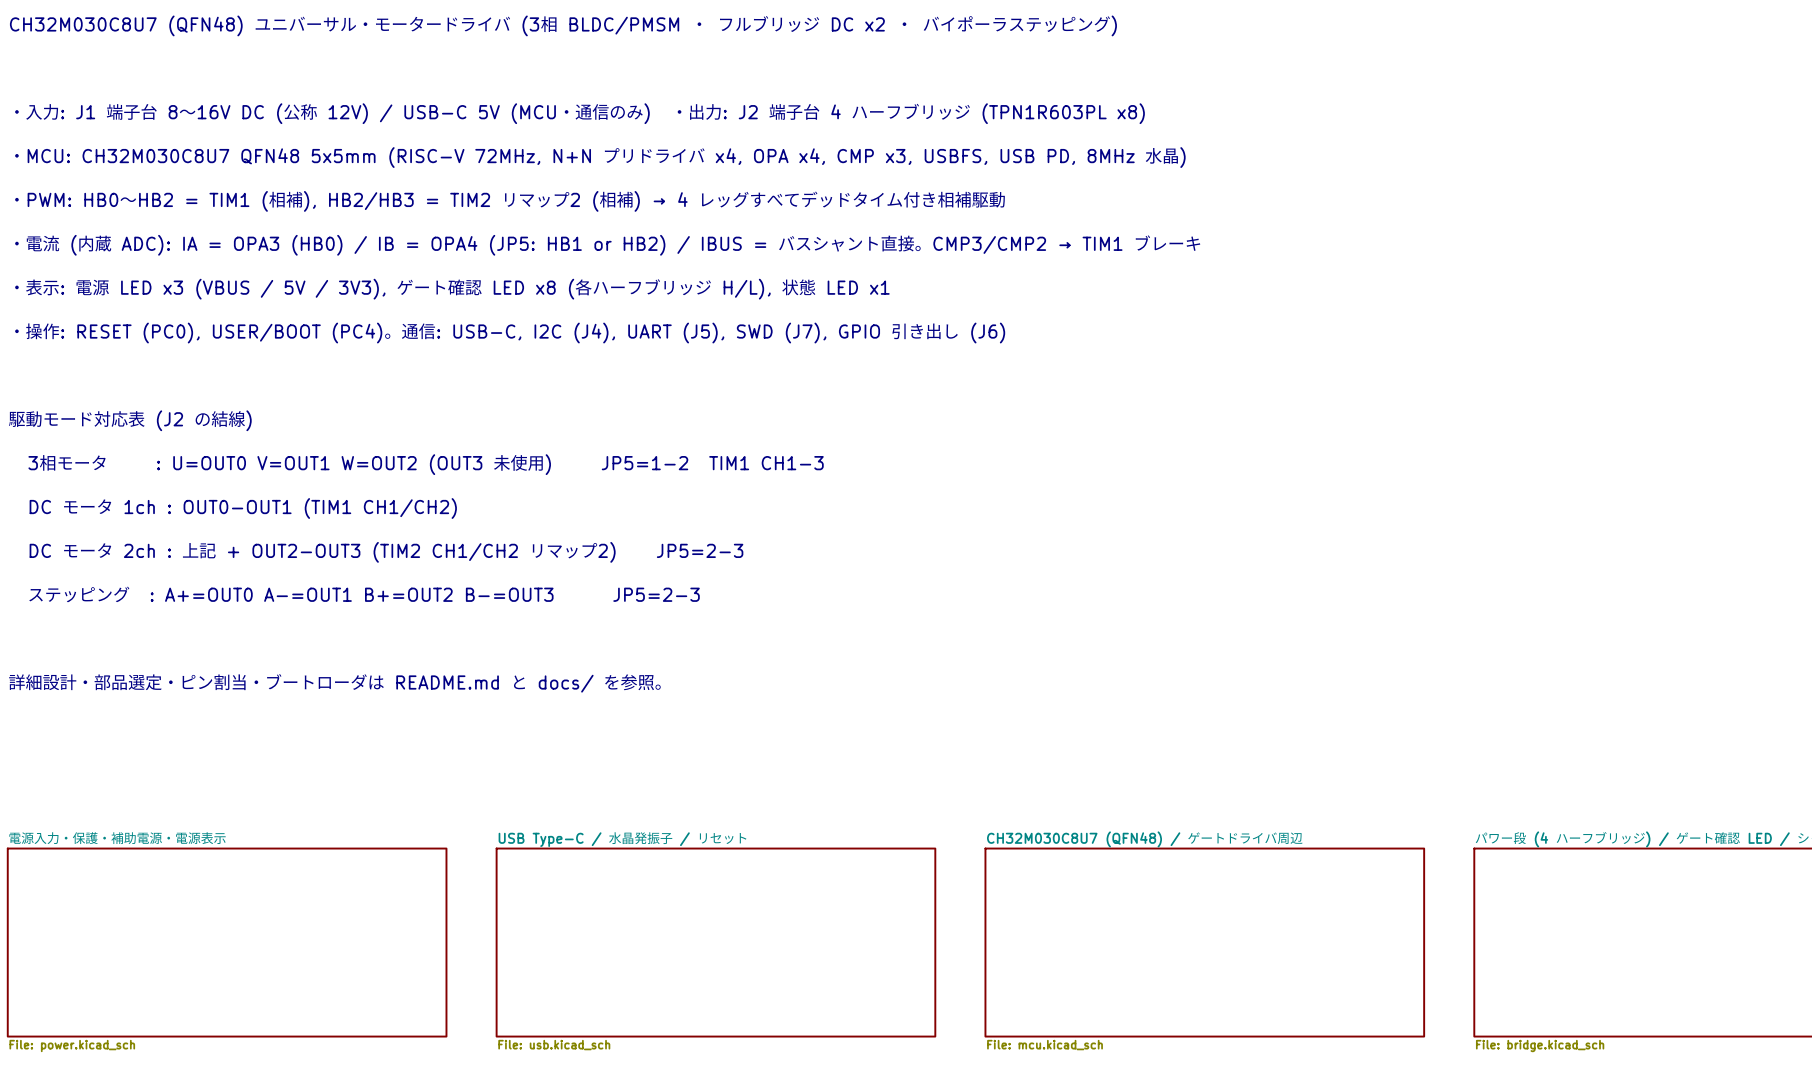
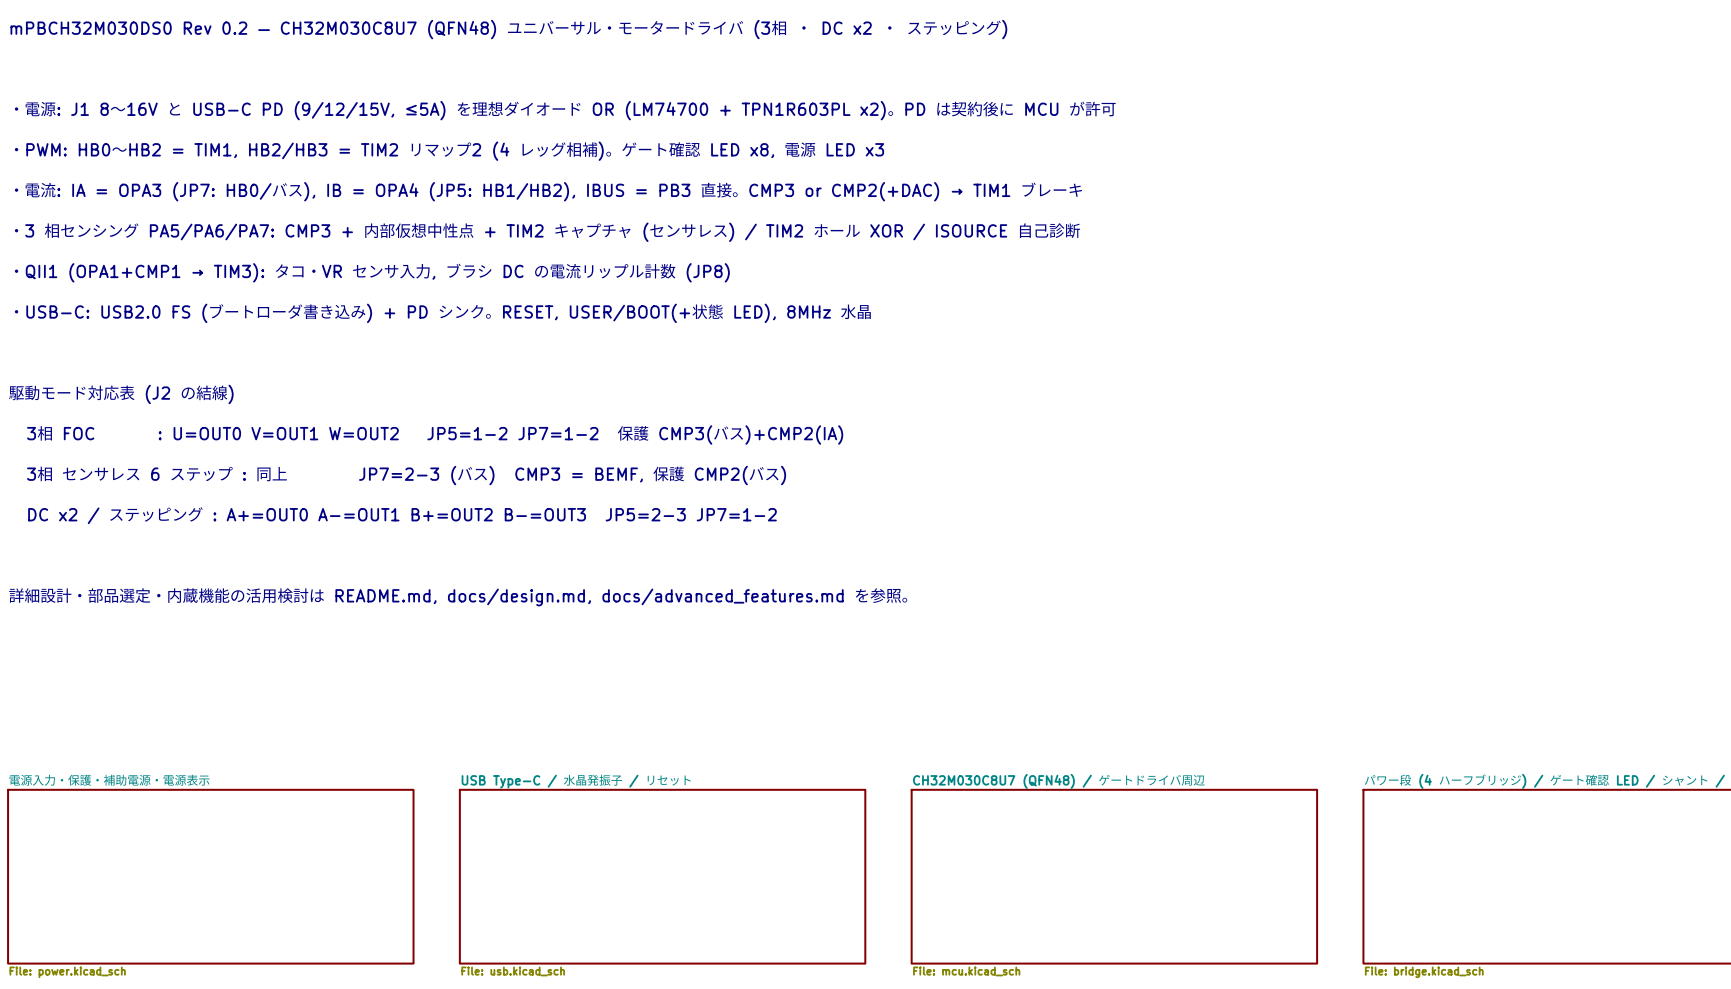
text: CH32M030C8U7 (QFN48) ユニバーサル・モータードライバ (3相 BLDC/PMSM ・ フルブリッジ DC x2 ・ バイポーラステッピング) (563, 25) -> mPBCH32M030DS0 Rev 0.2 — CH32M030C8U7 (QFN48) ユニバーサル・モータードライバ (3相 ・ DC x2 ・ ステッピング) (508, 29)
text: ・入力: J1 端子台 8〜16V DC (公称 12V) / USB-C 5V (MCU・通信のみ) ・出力: J2 端子台 4 ハーフブリッジ (TPN1R603PL x8) (579, 113) -> ・電源: J1 8〜16V と USB-C PD (9/12/15V, ≤5A) を理想ダイオード OR (LM74700 + TPN1R603PL x2)。PD は契約後に MCU が許可 (565, 110)
text: ・MCU: CH32M030C8U7 QFN48 5x5mm (RISC-V 72MHz, N+N プリドライバ x4, OPA x4, CMP x3, USBFS, USB PD, 8MHz 水晶) (599, 157) -> ・PWM: HB0〜HB2 = TIM1, HB2/HB3 = TIM2 リマップ2 (4 レッグ相補)。ゲート確認 LED x8, 電源 LED x3 (449, 151)
text: ・PWM: HB0〜HB2 = TIM1 (相補), HB2/HB3 = TIM2 リマップ2 (相補) → 4 レッグすべてデッドタイム付き相補駆動 (509, 201) -> ・電流: IA = OPA3 (JP7: HB0/バス), IB = OPA4 (JP5: HB1/HB2), IBUS = PB3 直接。CMP3 or CMP2(+DAC) → TIM1 ブレーキ (548, 191)
text: ・電流 (内蔵 ADC): IA = OPA3 (HB0) / IB = OPA4 (JP5: HB1 or HB2) / IBUS = バスシャント直接。CMP3/CMP2 → TIM1 ブレーキ (607, 245) -> ・3 相センシング PA5/PA6/PA7: CMP3 + 内部仮想中性点 + TIM2 キャプチャ (センサレス) / TIM2 ホール XOR / ISOURCE 自己診断 (547, 232)
text: ・表示: 電源 LED x3 (VBUS / 5V / 3V3), ゲート確認 LED x8 (各ハーフブリッジ H/L), 状態 LED x1 (451, 288) -> ・QII1 (OPA1+CMP1 → TIM3): タコ・VR センサ入力, ブラシ DC の電流リップル計数 (JP8) (371, 272)
text: ・操作: RESET (PC0), USER/BOOT (PC4)。通信: USB-C, I2C (J4), UART (J5), SWD (J7), GPIO 引き出し (J6) (509, 333) -> ・USB-C: USB2.0 FS (ブートローダ書き込み) + PD シンク。RESET, USER/BOOT(+状態 LED), 8MHz 水晶 (442, 313)
text: 3相モータ : U=OUT0 V=OUT1 W=OUT2 (OUT3 未使用) JP5=1-2 TIM1 CH1-3 (426, 464) -> 3相 FOC : U=OUT0 V=OUT1 W=OUT2 JP5=1-2 JP7=1-2 保護 CMP3(バス)+CMP2(IA) (435, 434)
text: DC モータ 1ch : OUT0-OUT1 (TIM1 CH1/CH2) (243, 508) -> 3相 センサレス 6 ステップ : 同上 JP7=2-3 (バス) CMP3 = BEMF, 保護 CMP2(バス) (406, 475)
text: DC モータ 2ch : 上記 + OUT2-OUT3 (TIM2 CH1/CH2 リマップ2) JP5=2-3 (386, 552) -> DC x2 / ステッピング : A+=OUT0 A-=OUT1 B+=OUT2 B-=OUT3 JP5=2-3 JP7=1-2 (402, 515)
text: ステッピング : A+=OUT0 A-=OUT1 B+=OUT2 B-=OUT3 JP5=2-3 (364, 594) -> none
text: none -> 詳細設計・部品選定・内蔵機能の活用検討は README.md, docs/design.md, docs/advanced_features.md を参照。 (458, 596)
text: 詳細設計・部品選定・ピン割当・ブートローダは README.md と docs/ を参照。 (334, 682) -> none

